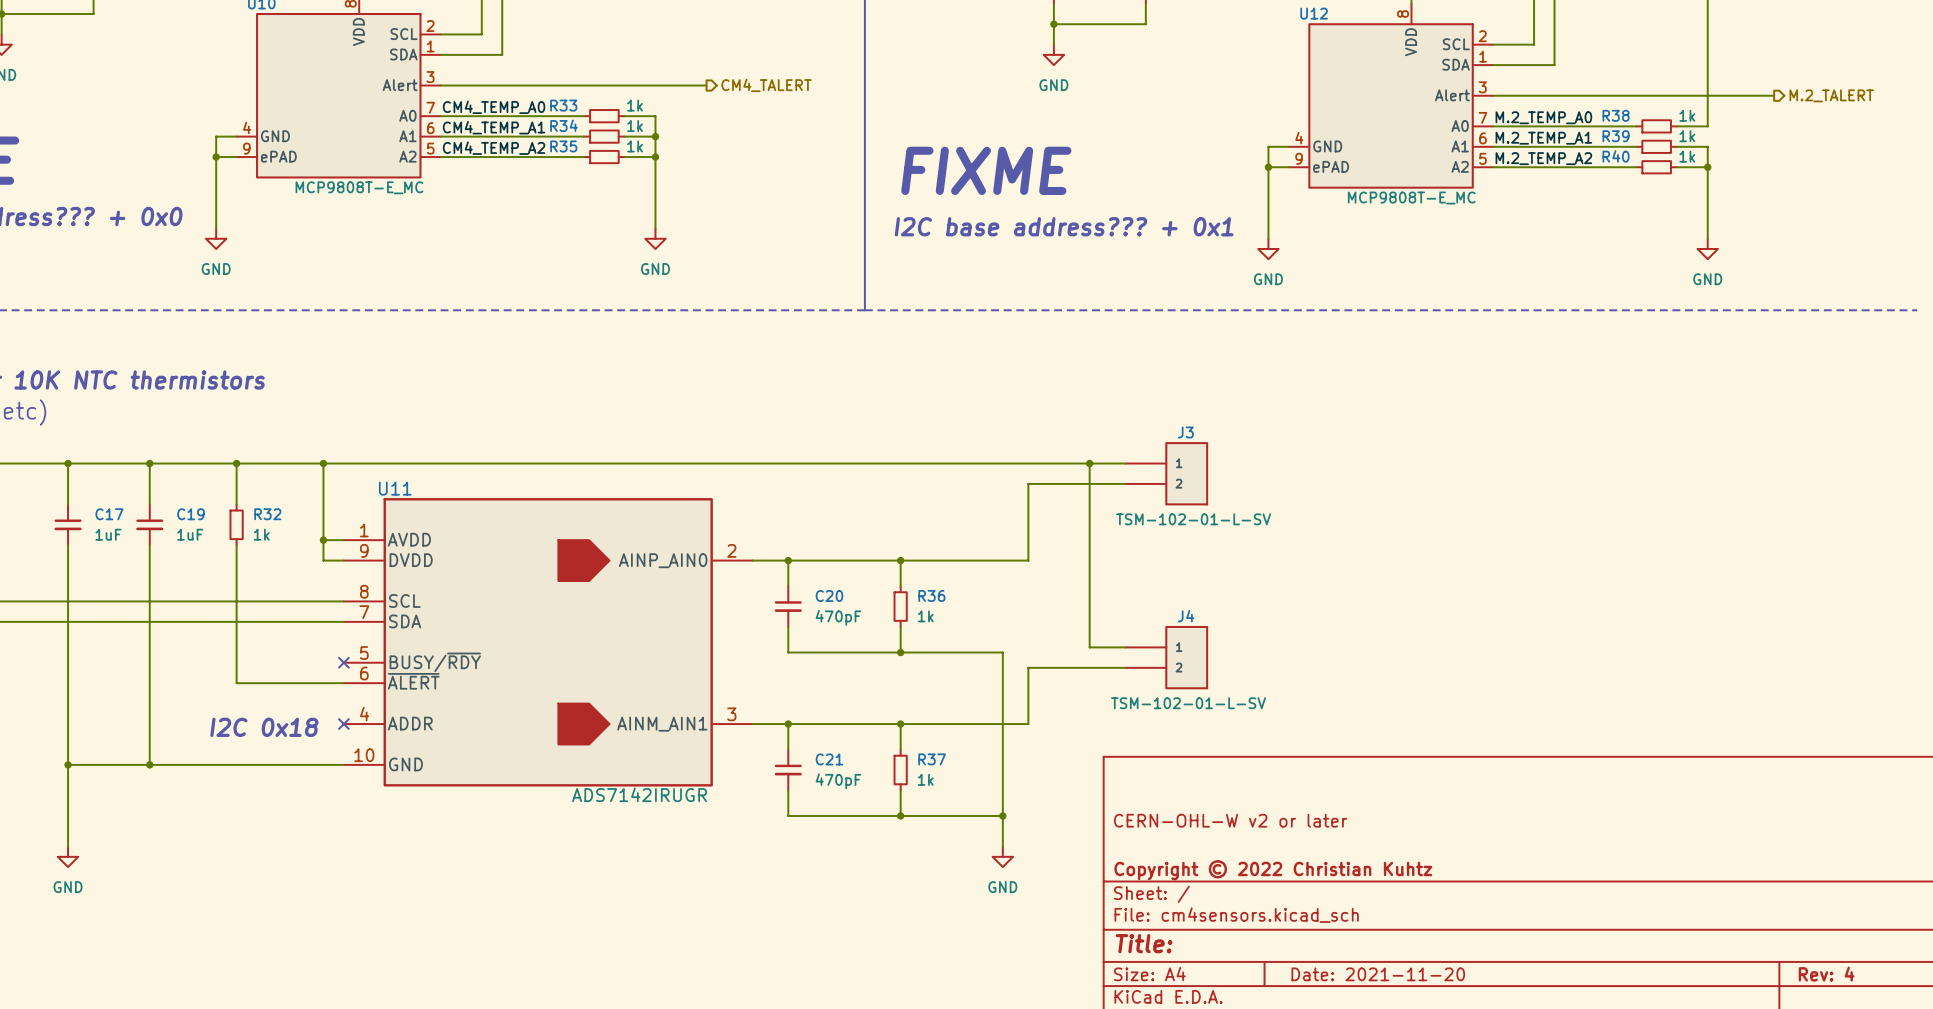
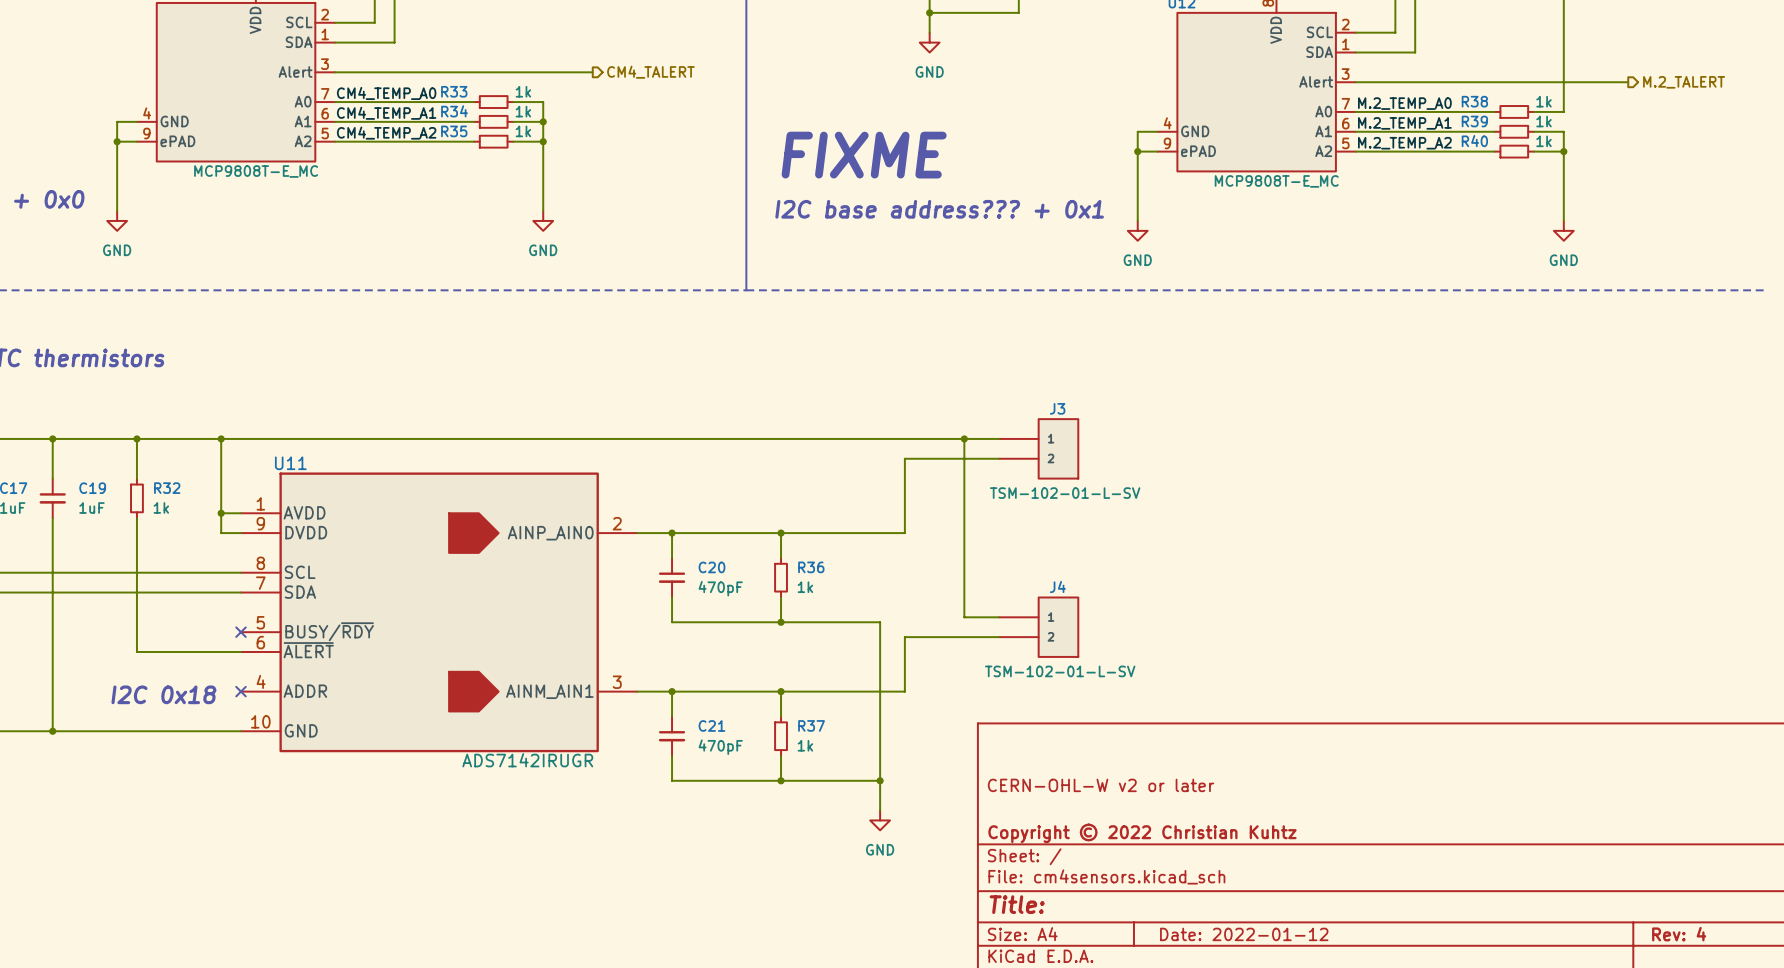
title block: Date: 2021-11-20 (1378, 974) -> Date: 2022-01-12 (1244, 934)

